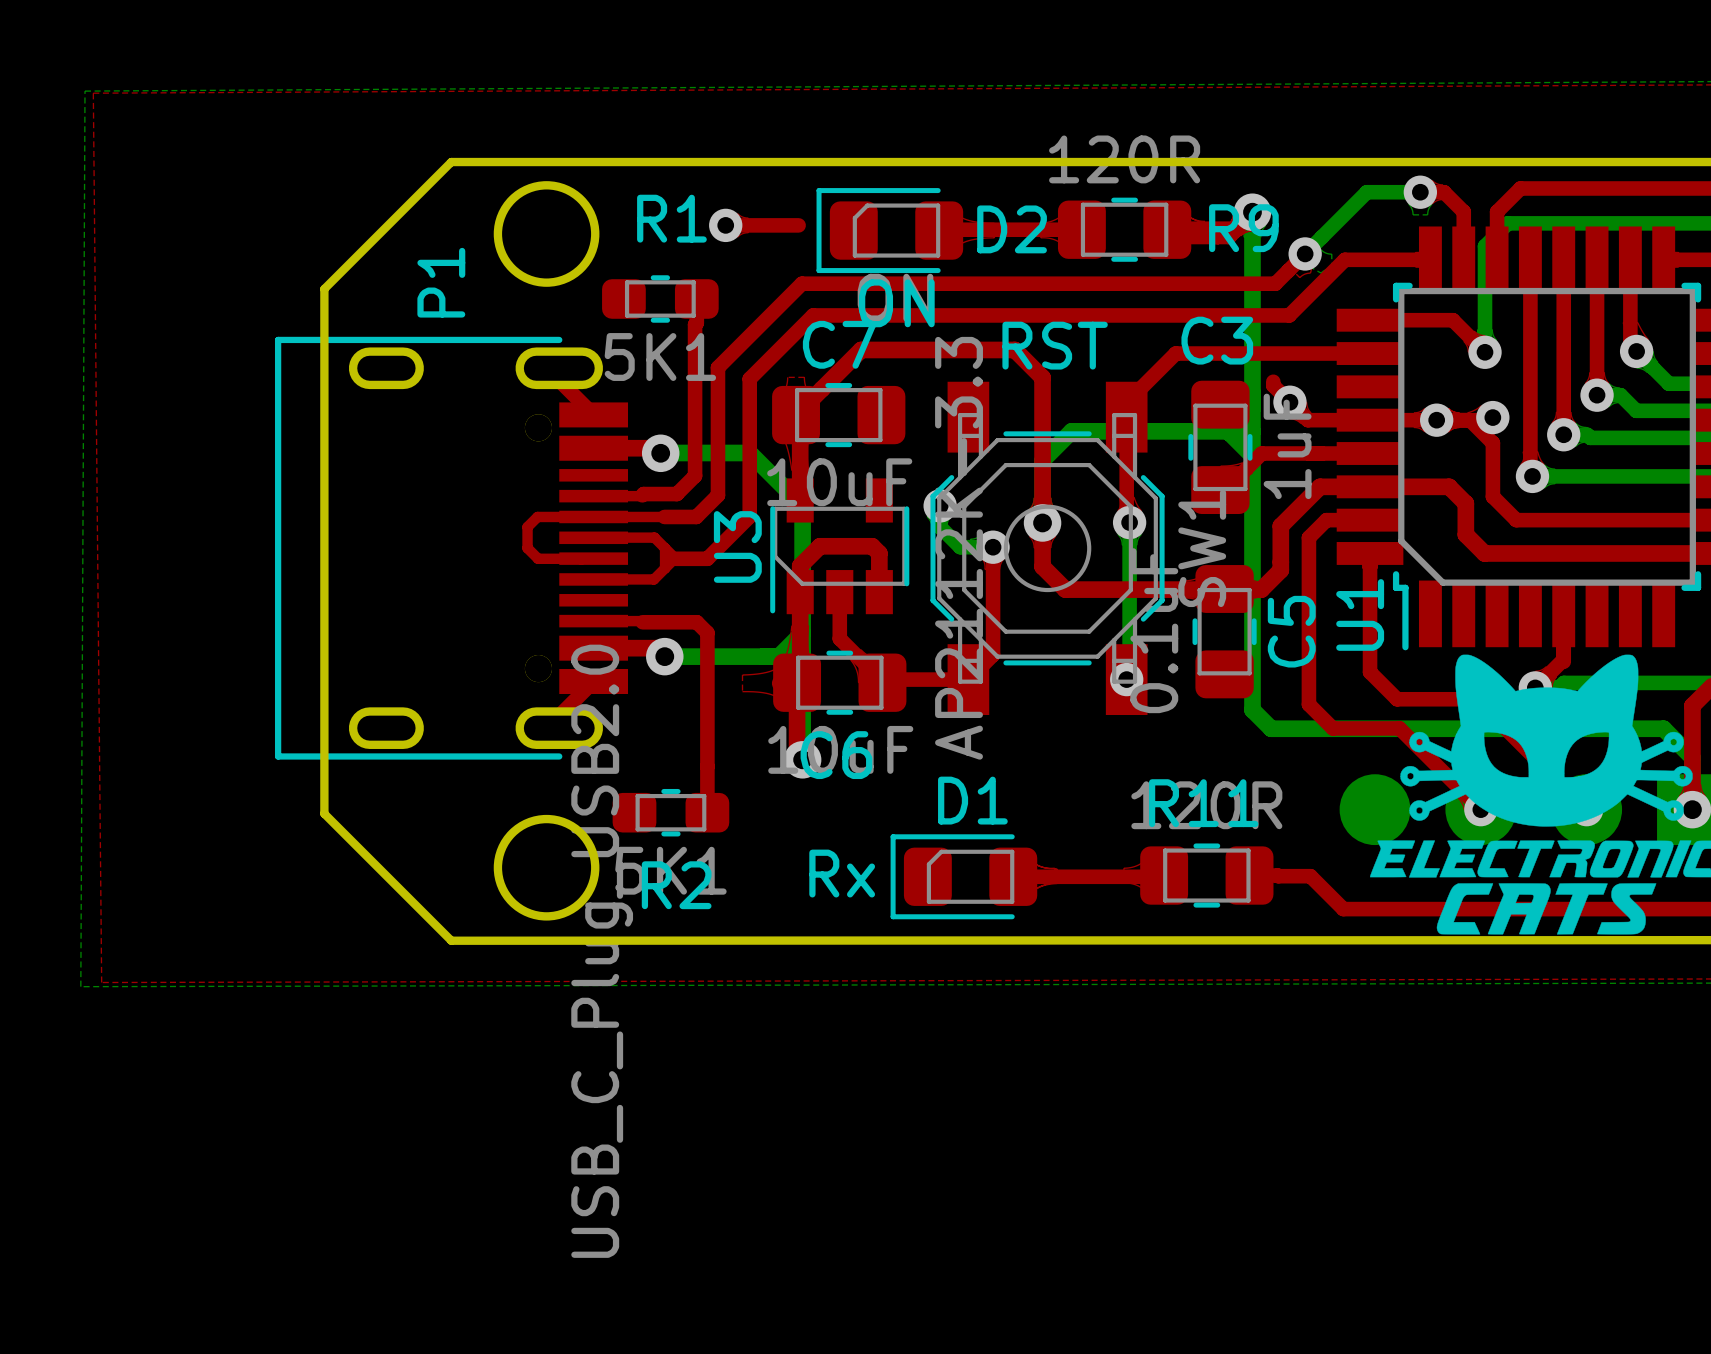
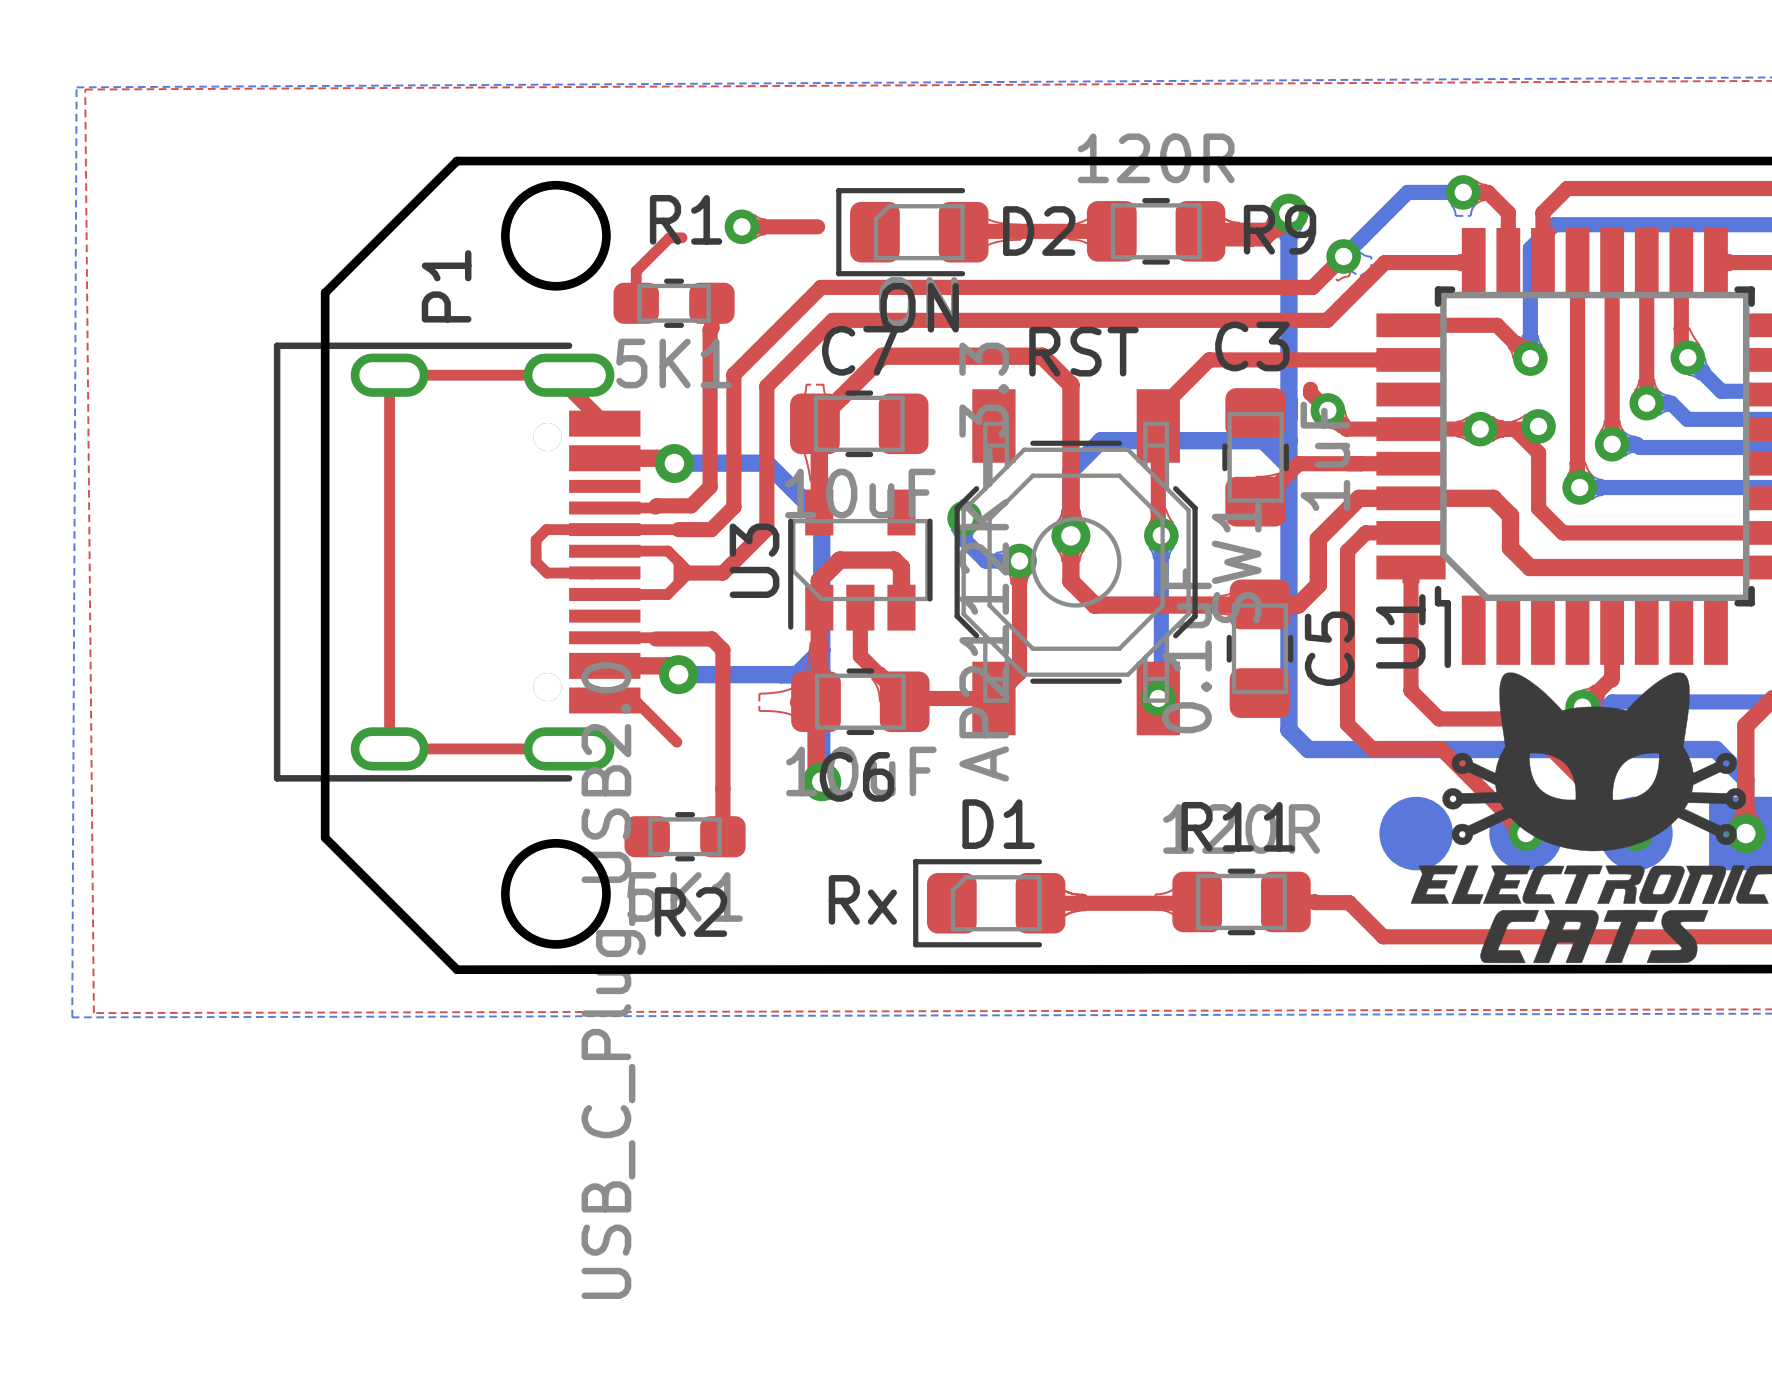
top track: none -> (682, 237) (669, 237) (636, 271) (636, 303)
top track: none -> (553, 359) (538, 375) (389, 375) (389, 748) (569, 748)
top track: (593, 681) (559, 715) -> (604, 700) (635, 700) (676, 742)

